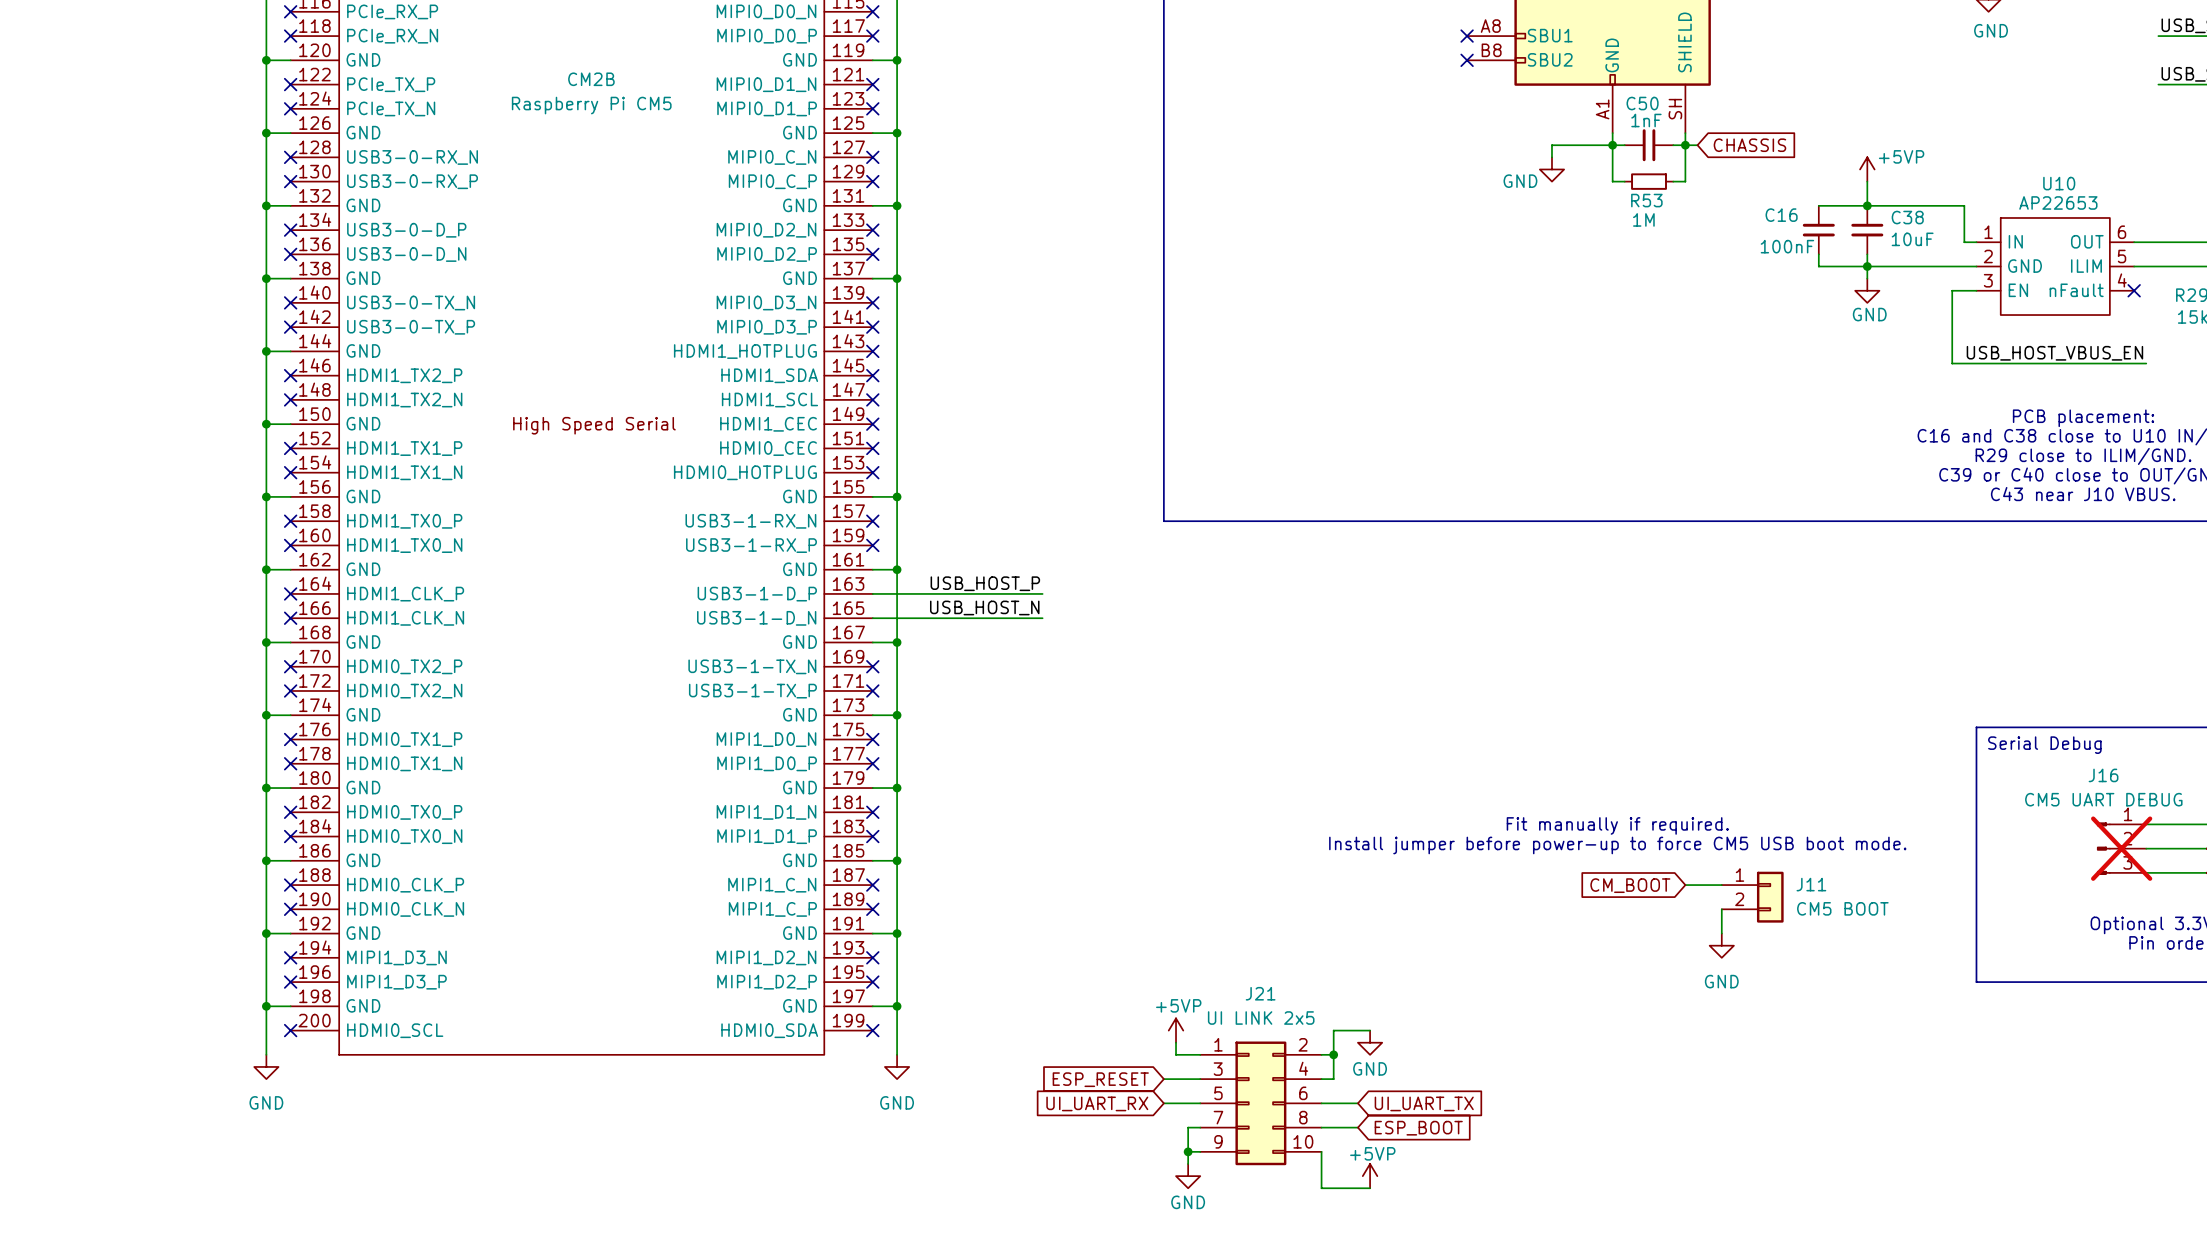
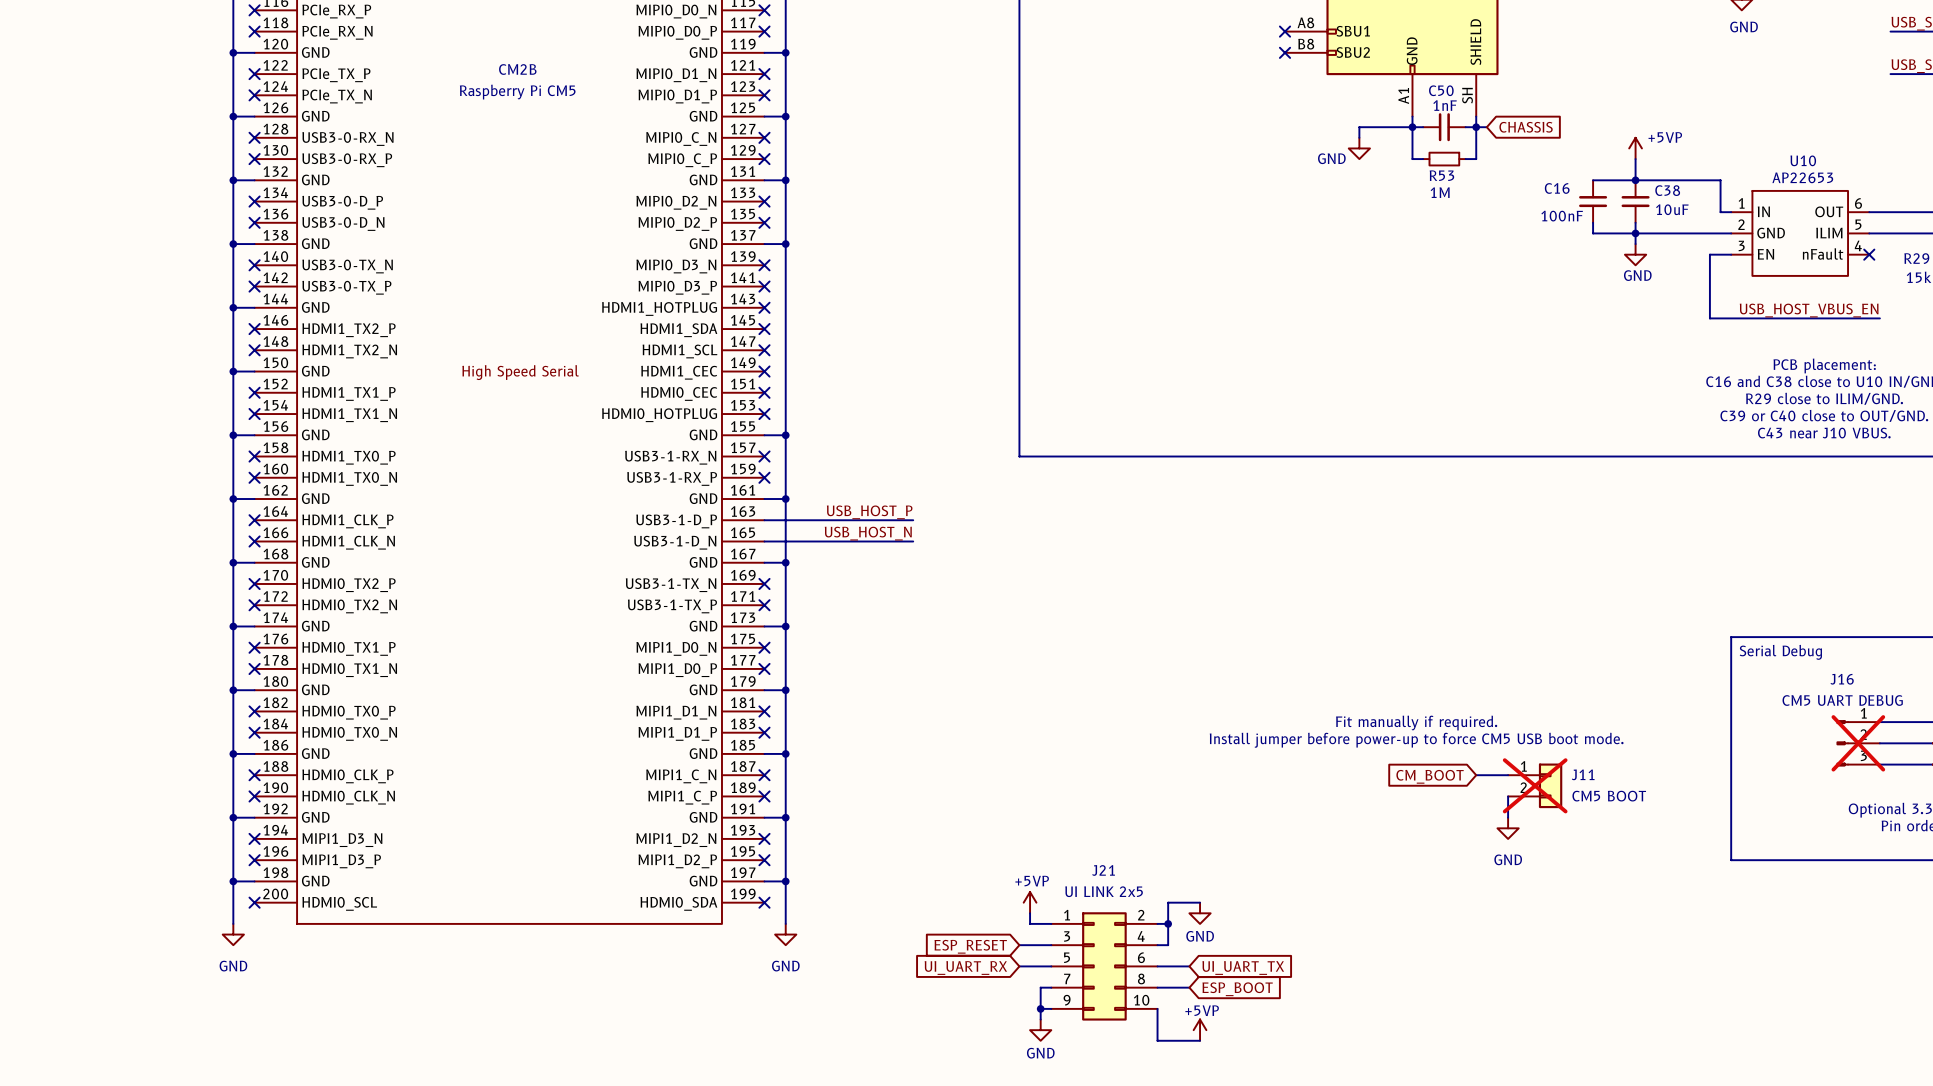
J11 do-not-place cross: none -> (1535, 785)

